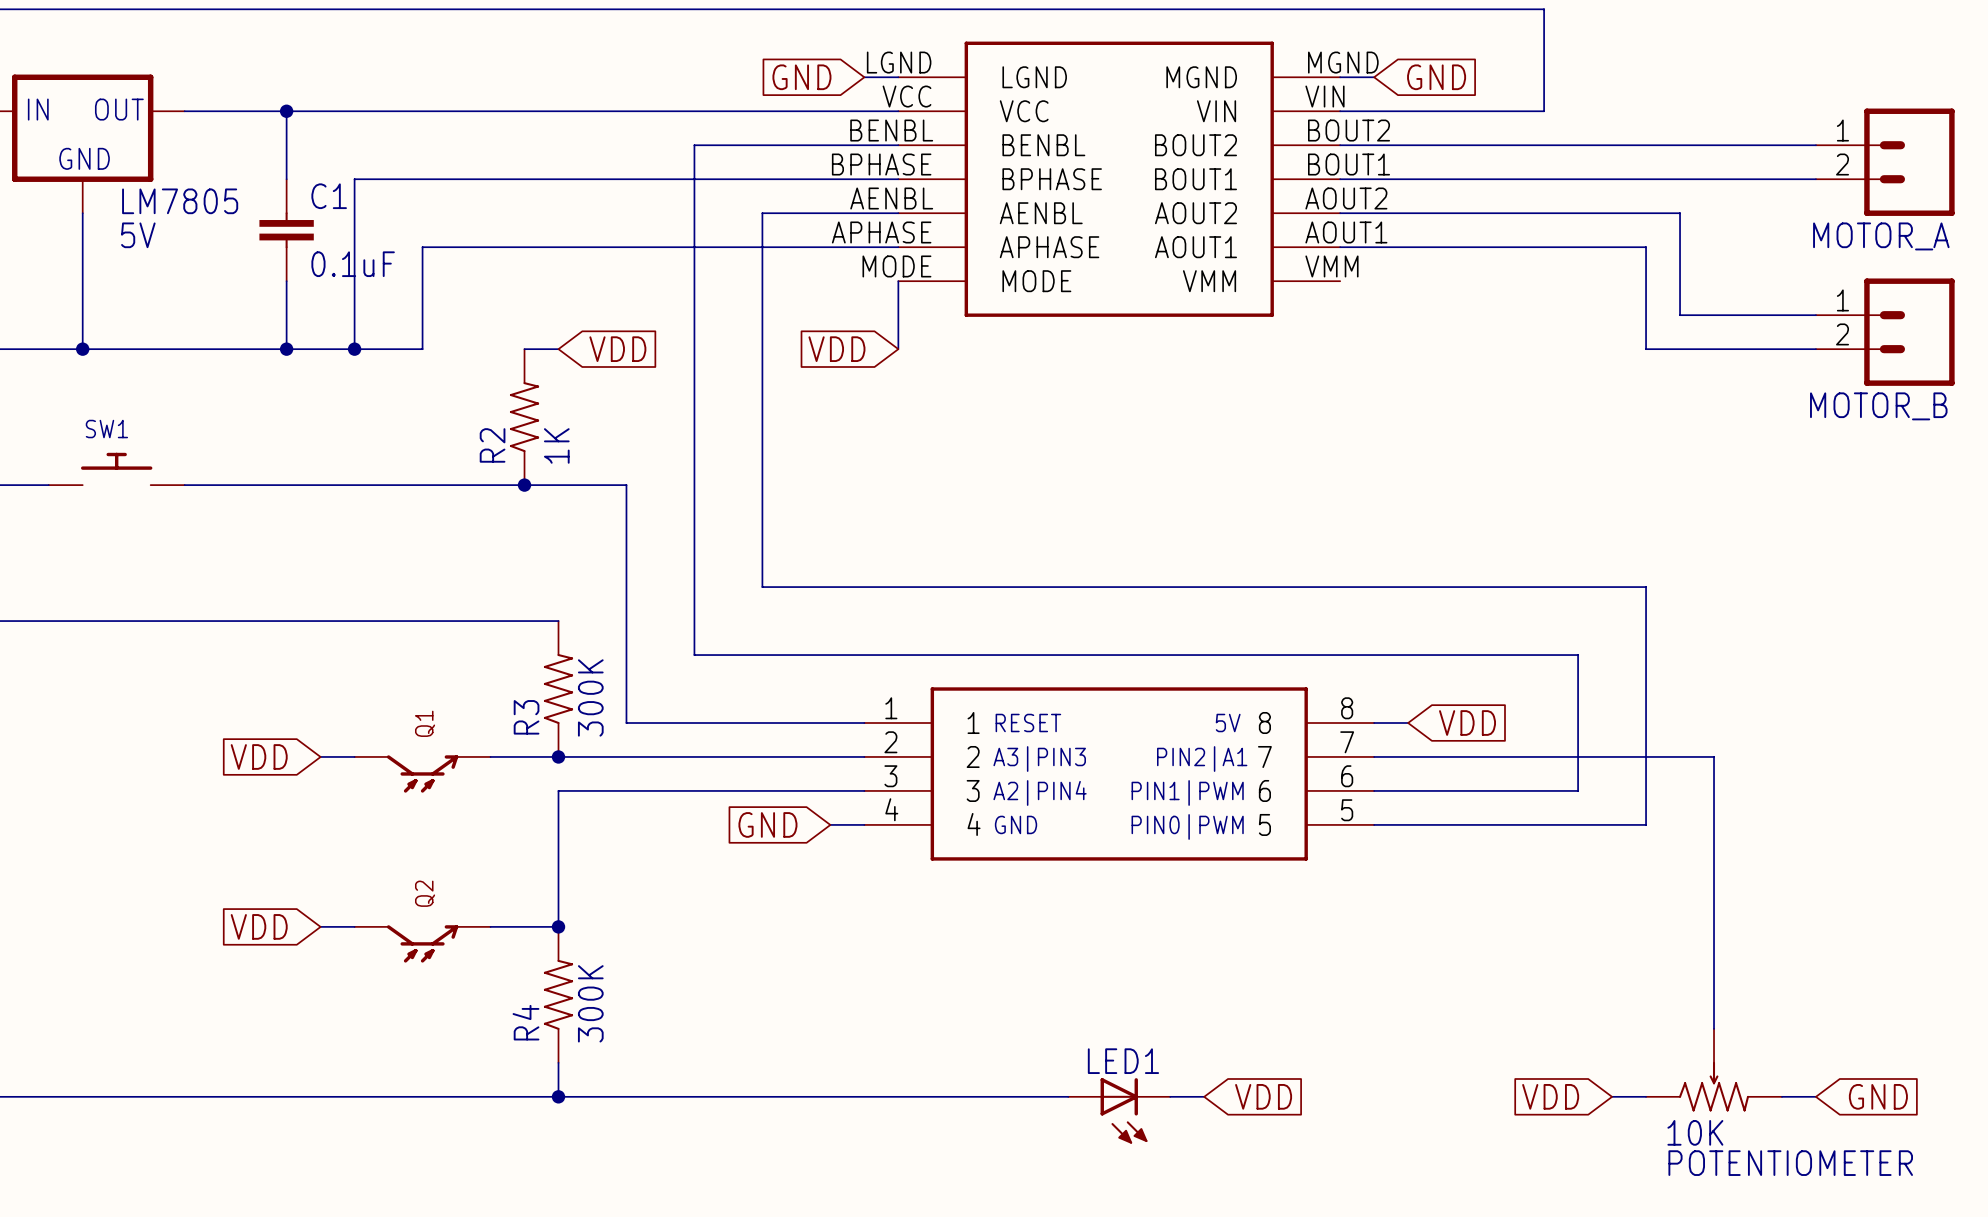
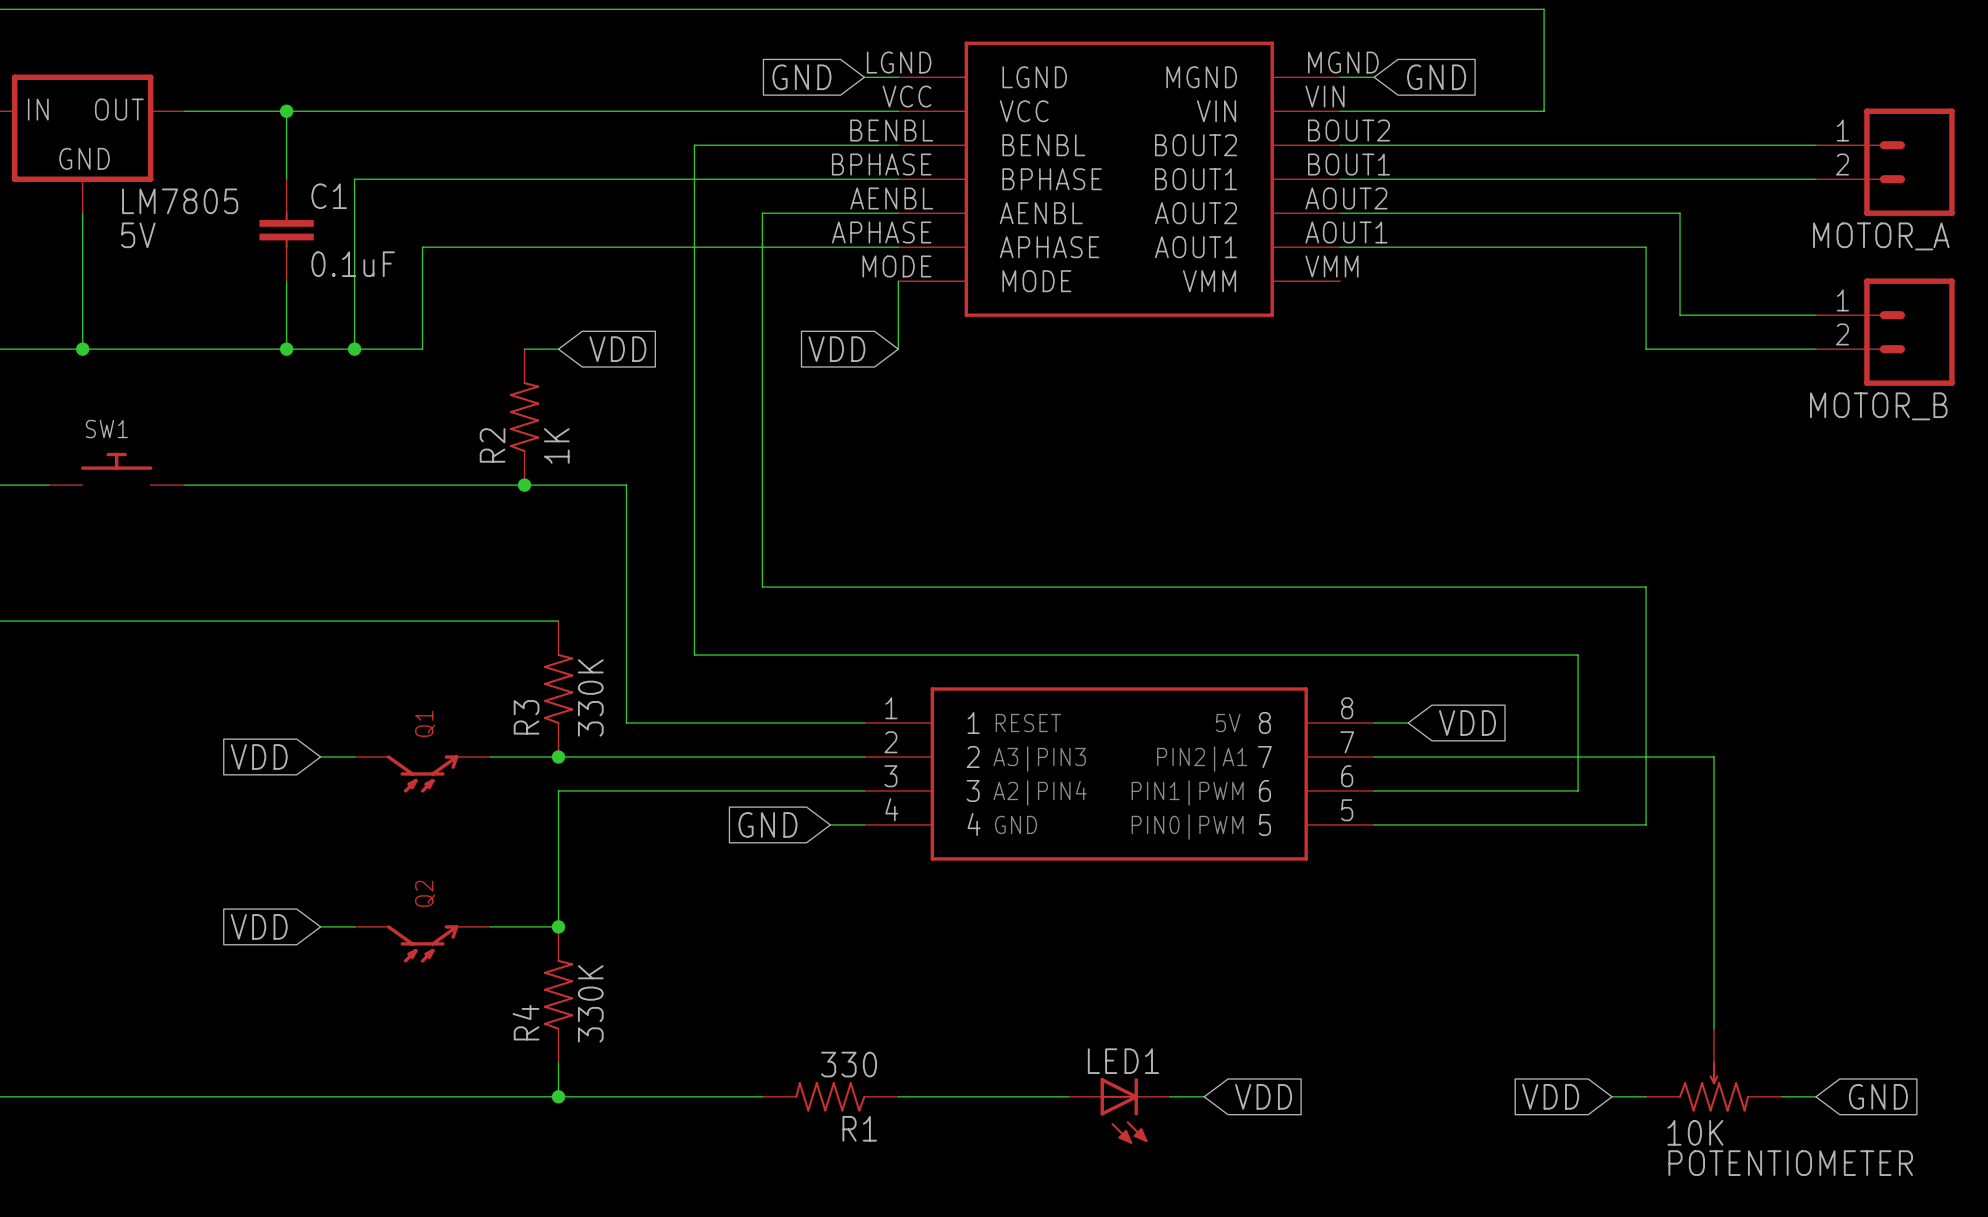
R3 value: 300K (590, 697) -> 330K (590, 697)
R4 value: 300K (590, 1003) -> 330K (590, 1003)
R1: none -> 330 (830, 1096)

